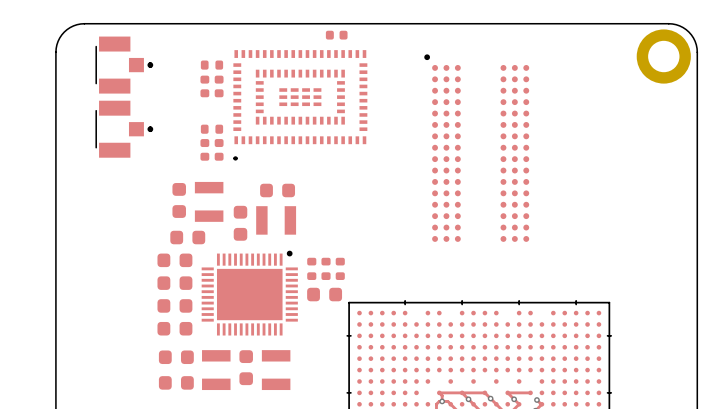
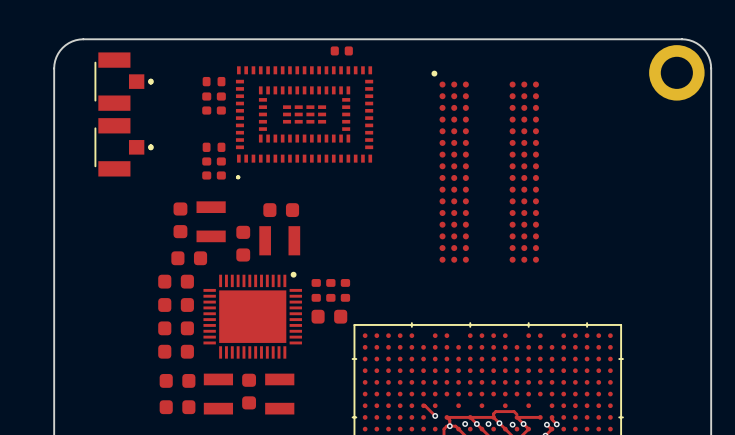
track: none -> (423, 405) (435, 415)
track: none -> (516, 414) (514, 411) (495, 411) (493, 417)
via: none -> (435, 415)
track: none -> (552, 417) (556, 424)
via: none -> (465, 423)
via: none -> (488, 423)
via: none -> (556, 424)
via: none -> (512, 424)

